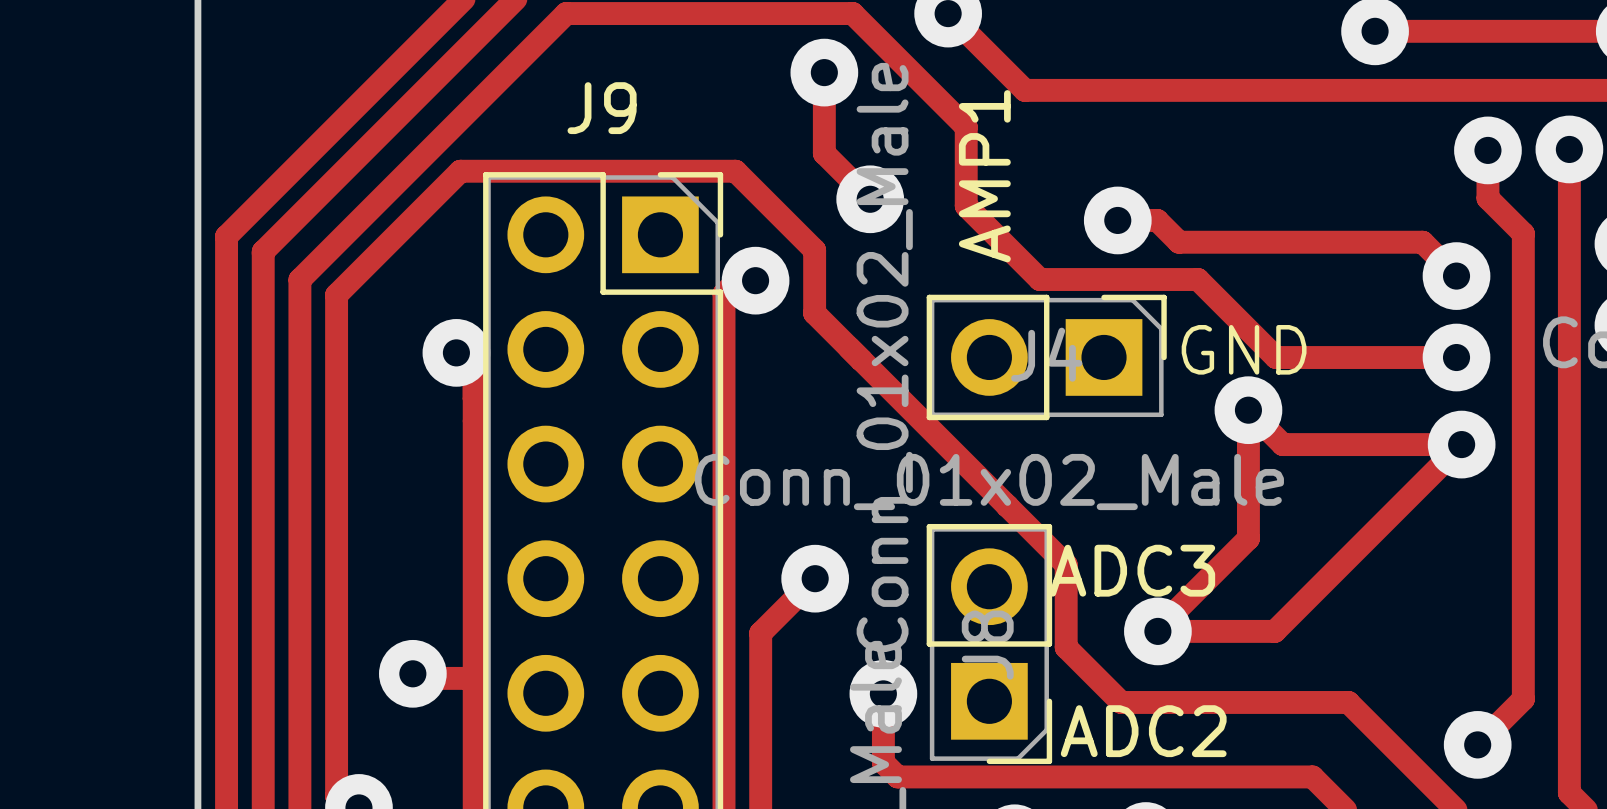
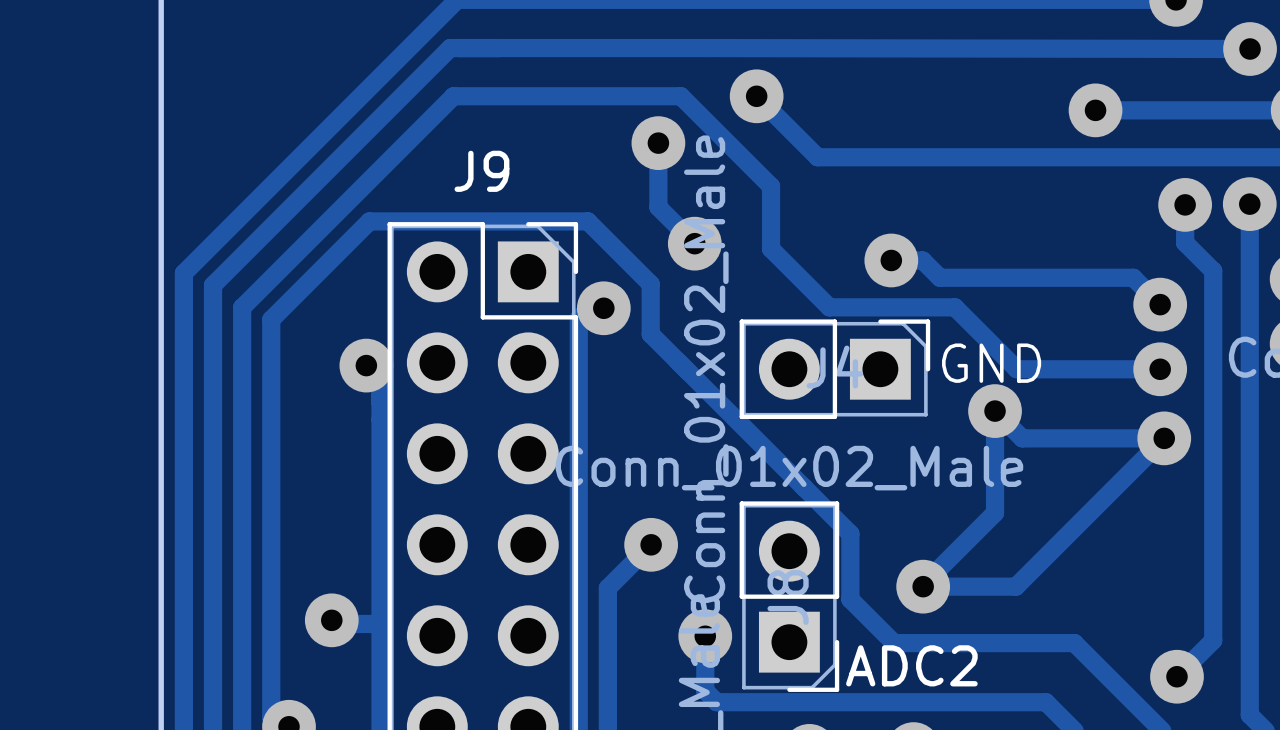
text: AMP1 (984, 176) -> none
text: ADC3 (1132, 570) -> none

